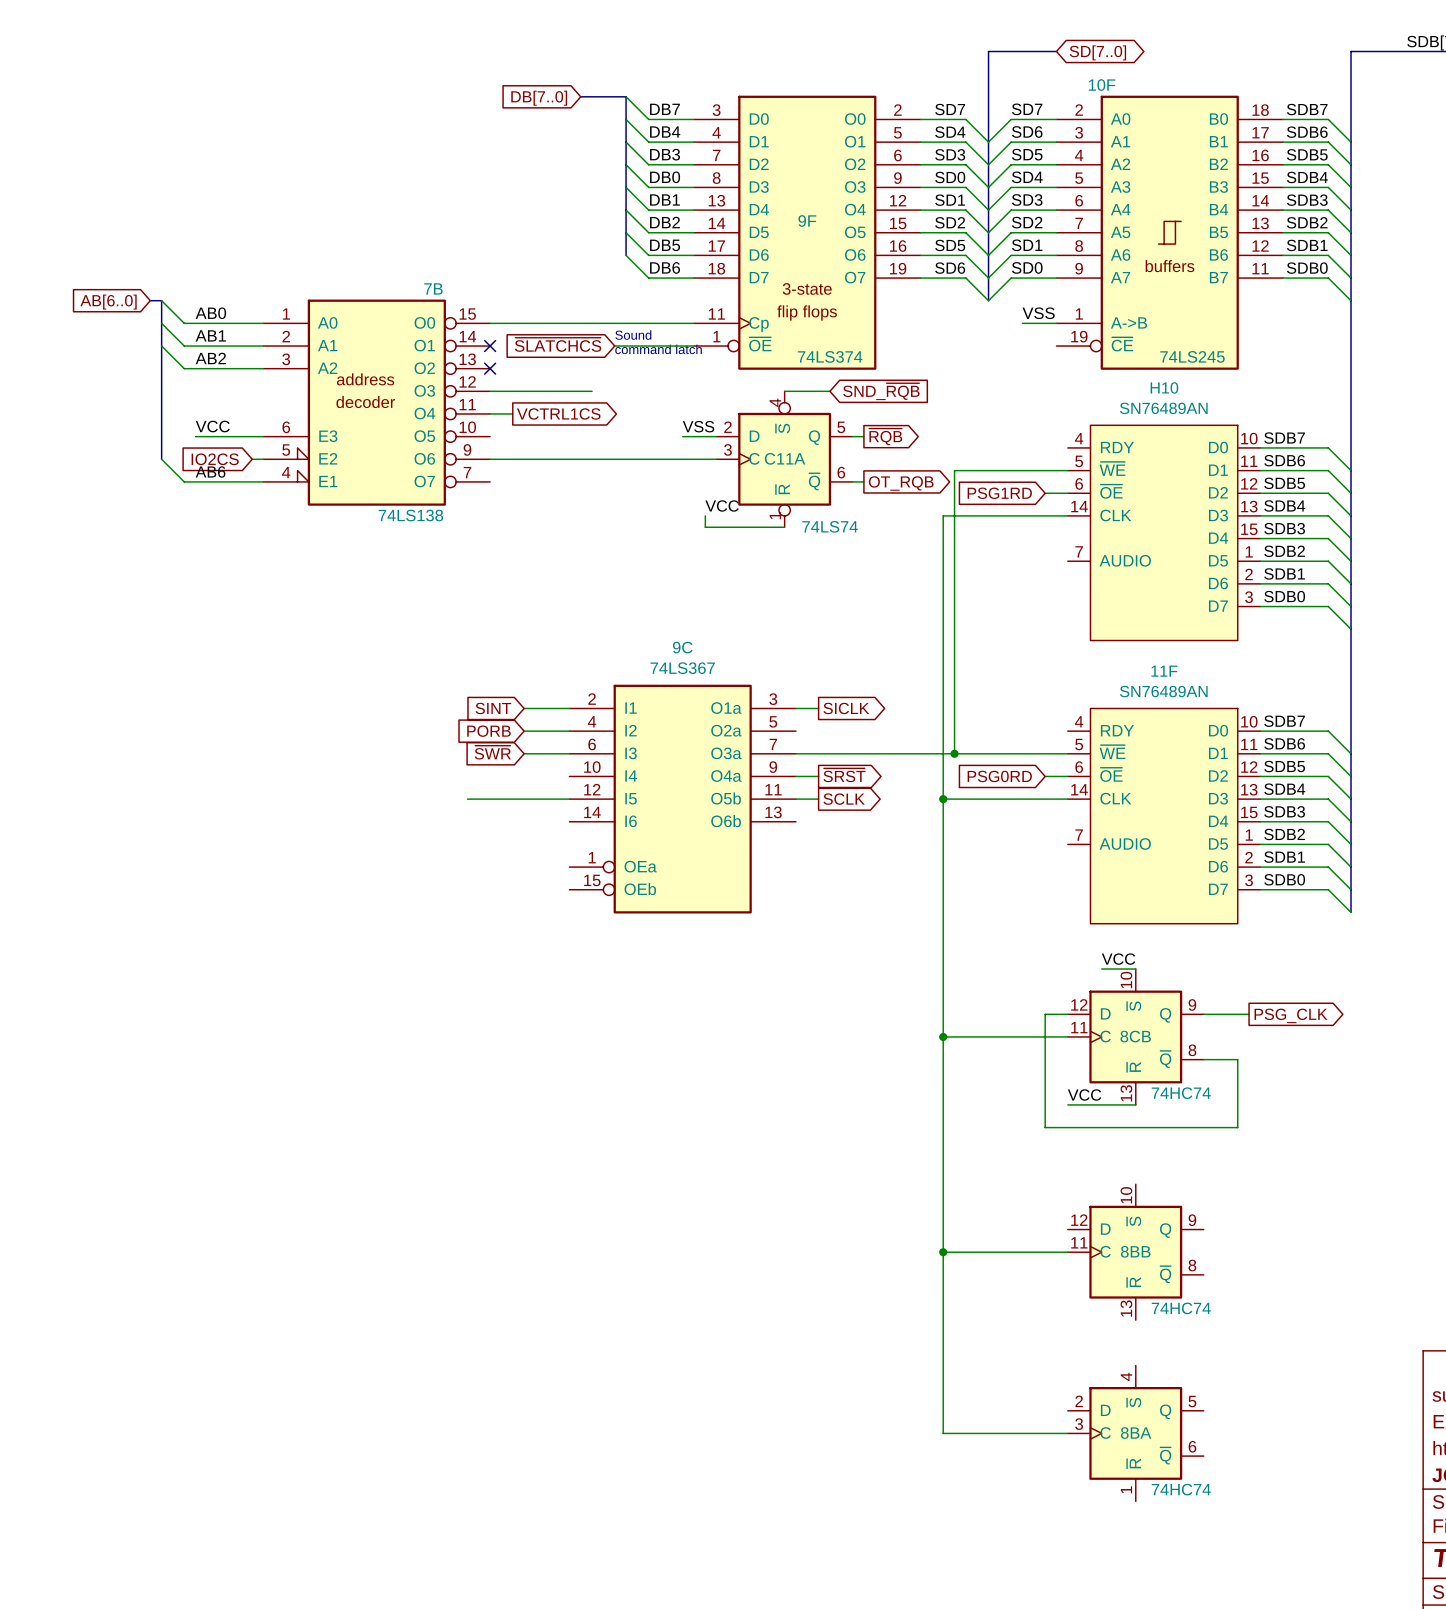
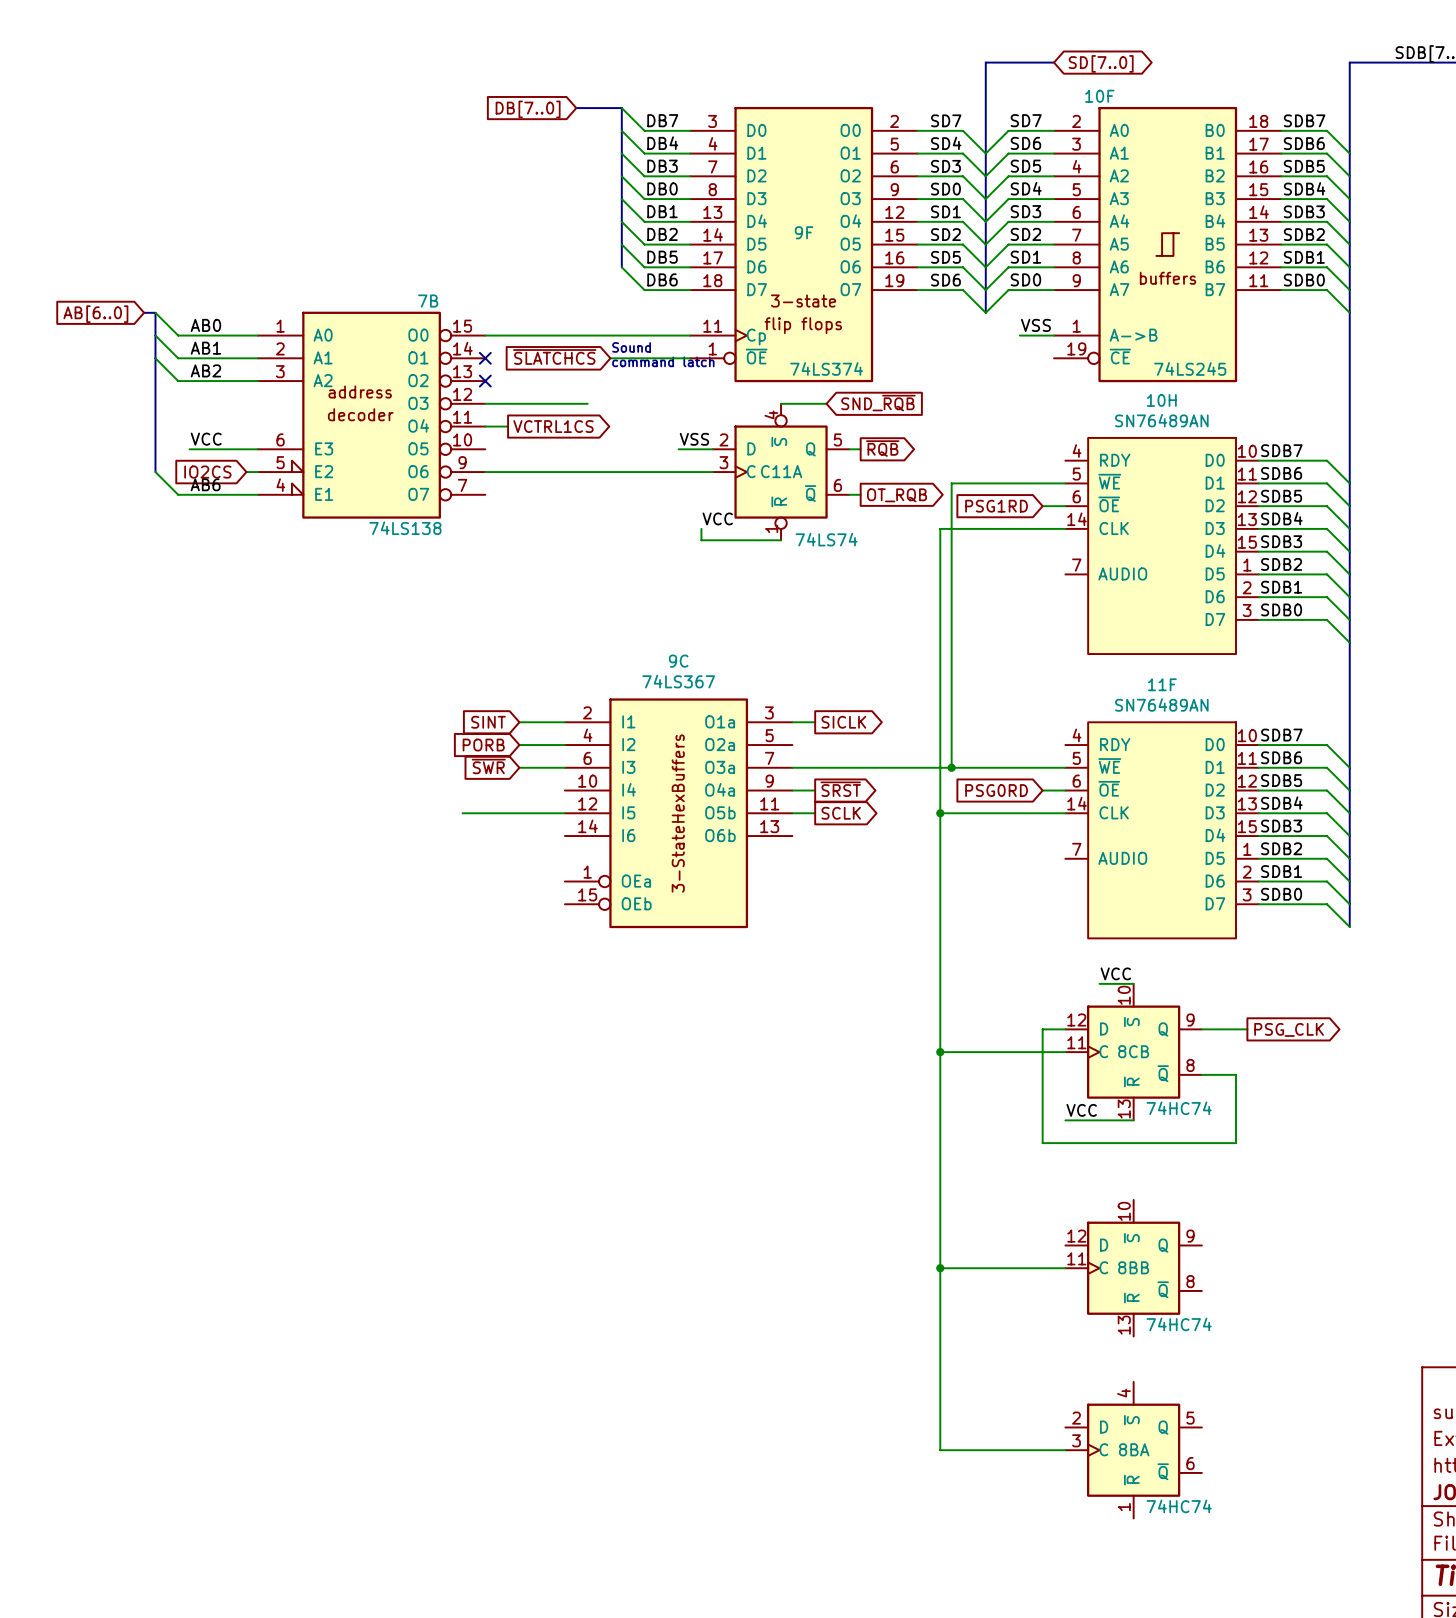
H10 name: H10 (1164, 387) -> 10H (1161, 400)
9C text: none -> 3-StateHexBuffers (678, 813)

